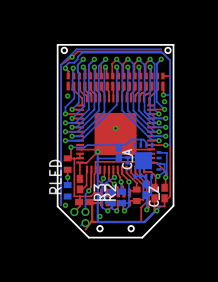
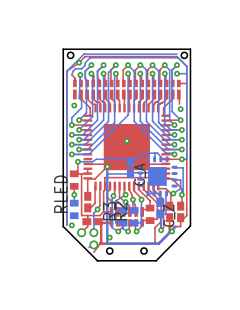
via: none -> (177, 73)
bottom track: none -> (186, 73) (177, 73)
via: (65, 68) -> none
via: (163, 94) -> none
bottom track: (170, 94) (163, 94) -> none
via: none -> (180, 109)
via: (164, 101) -> none

